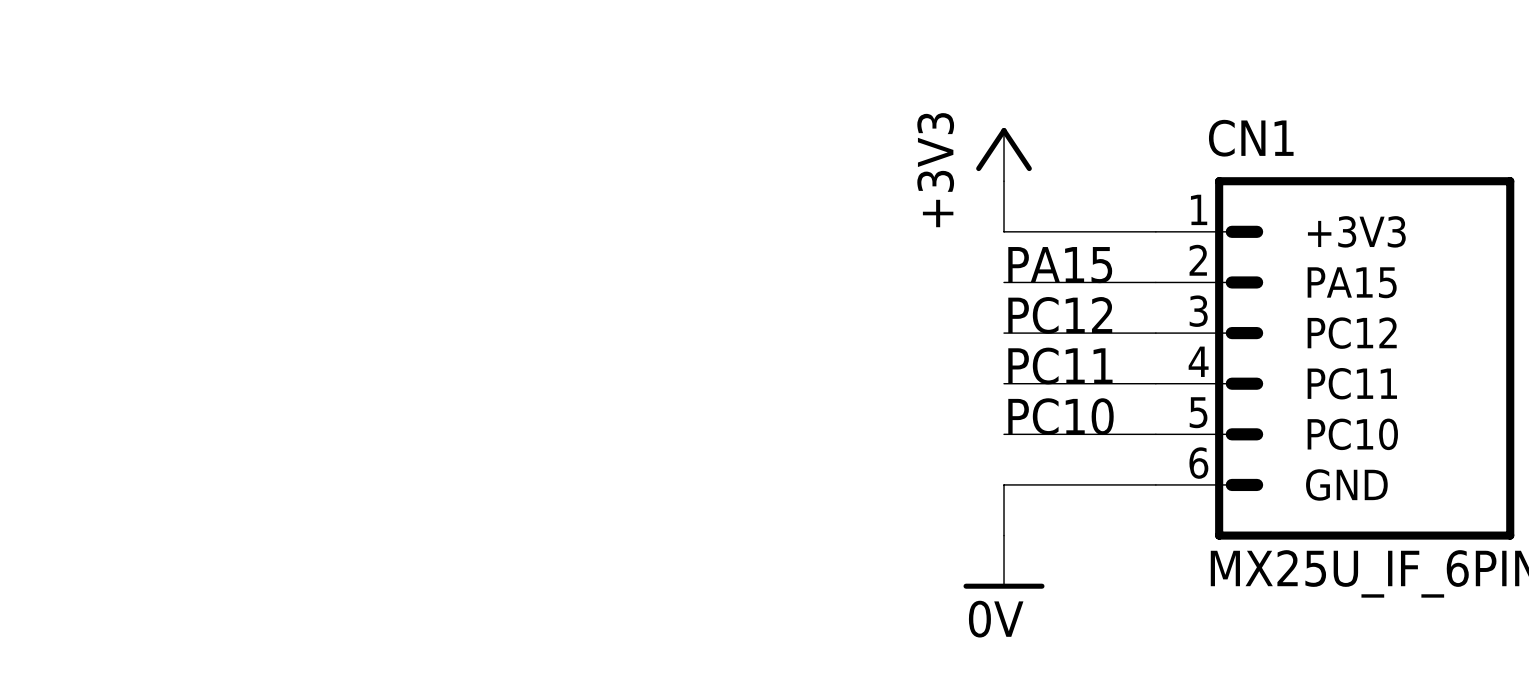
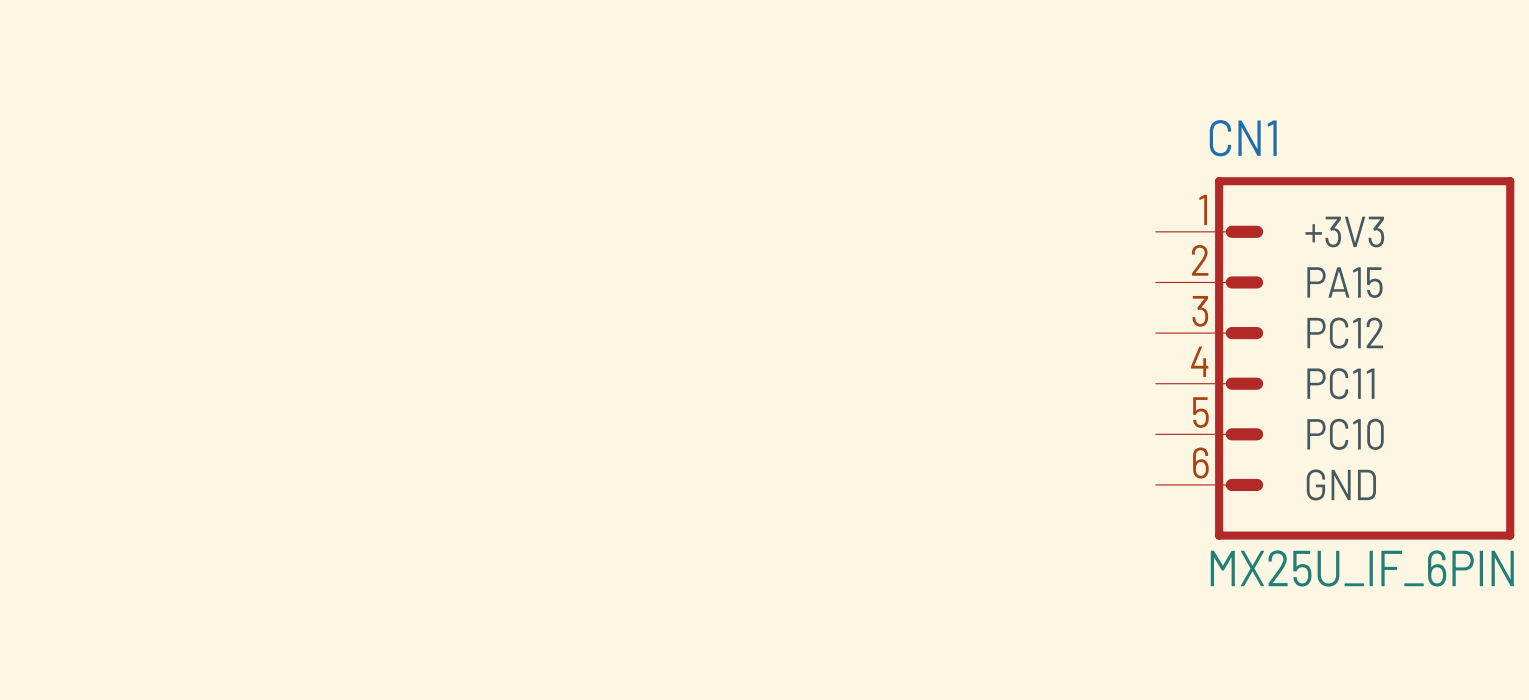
power symbol: +3V3 (1004, 154) -> none
wire: (1004, 181) (1004, 231) (1155, 231) -> none
label: PA15 (1060, 265) -> none
wire: (1004, 282) (1155, 282) -> none
label: PC12 (1060, 315) -> none
wire: (1004, 333) (1155, 333) -> none
label: PC11 (1060, 366) -> none
wire: (1004, 383) (1155, 383) -> none
label: PC10 (1060, 416) -> none
wire: (1004, 434) (1155, 434) -> none
wire: (1155, 484) (1004, 484) (1004, 535) -> none
power symbol: 0V (1004, 562) -> none

